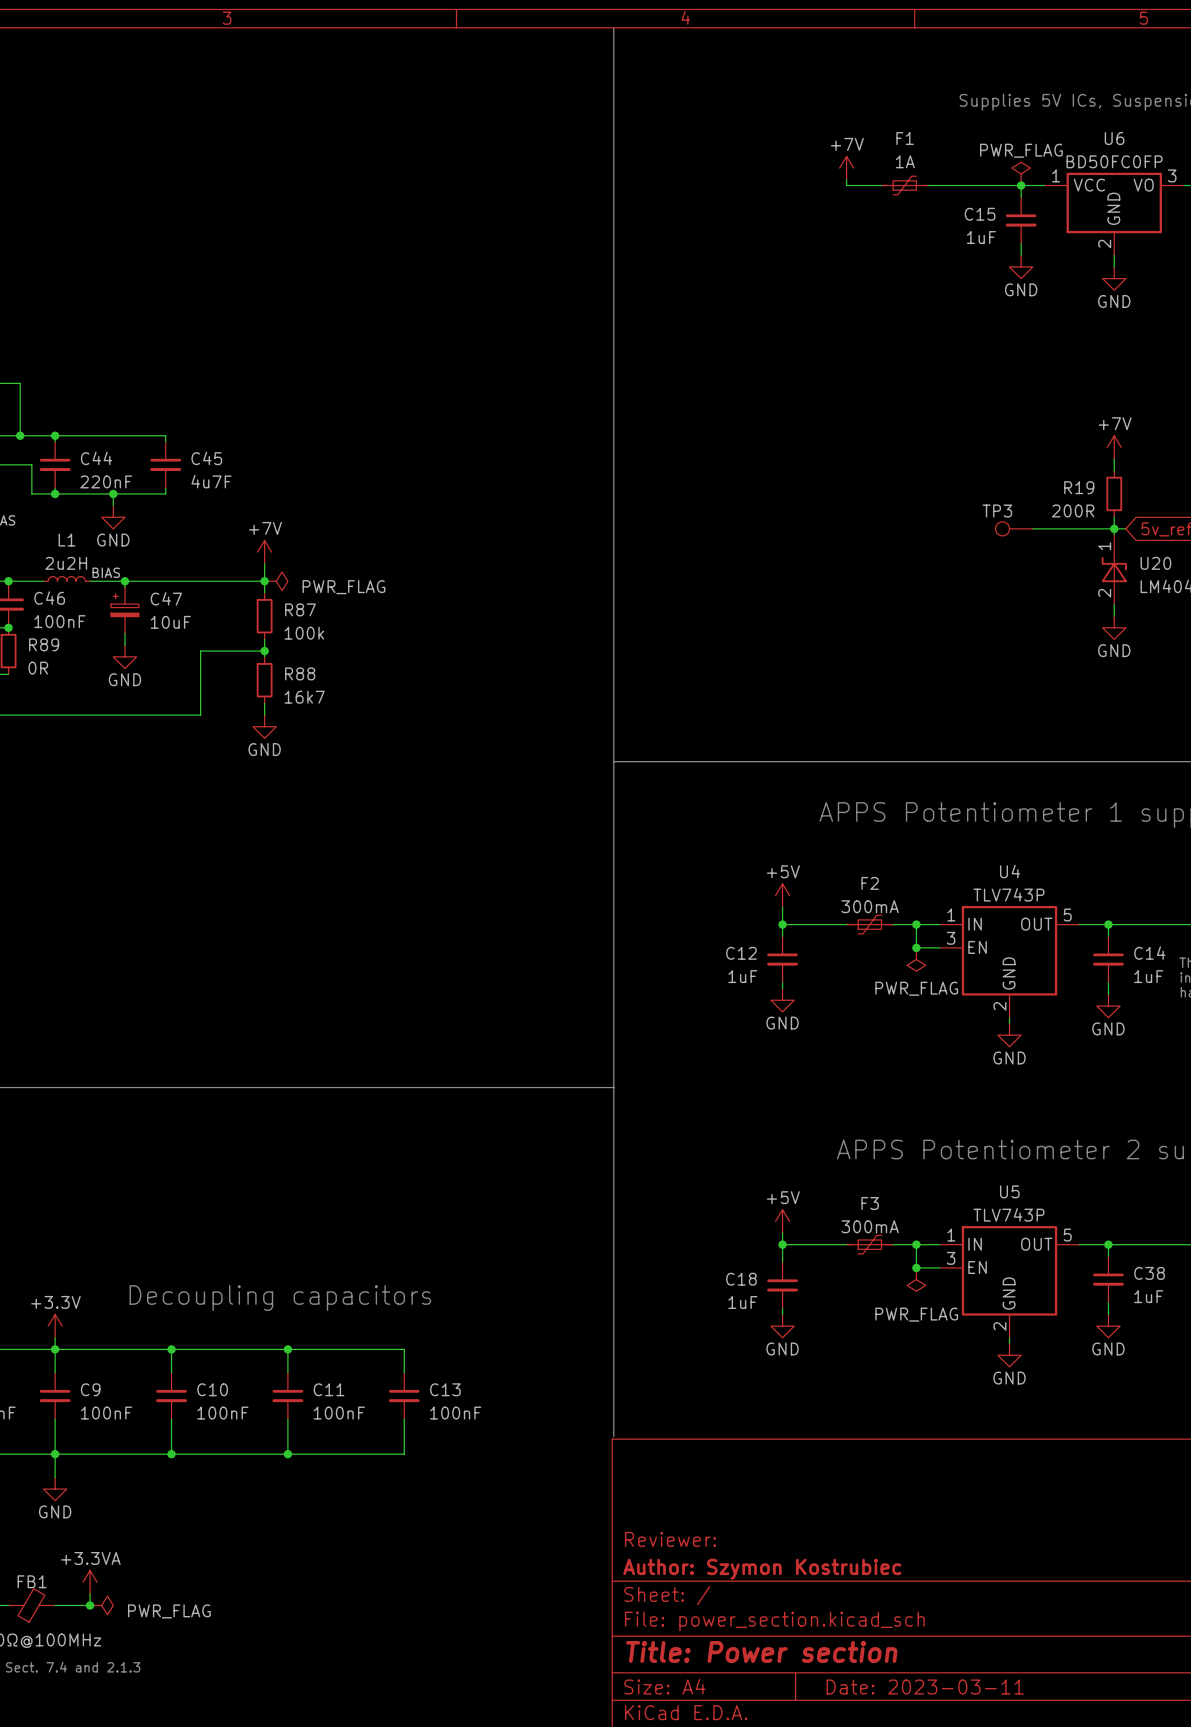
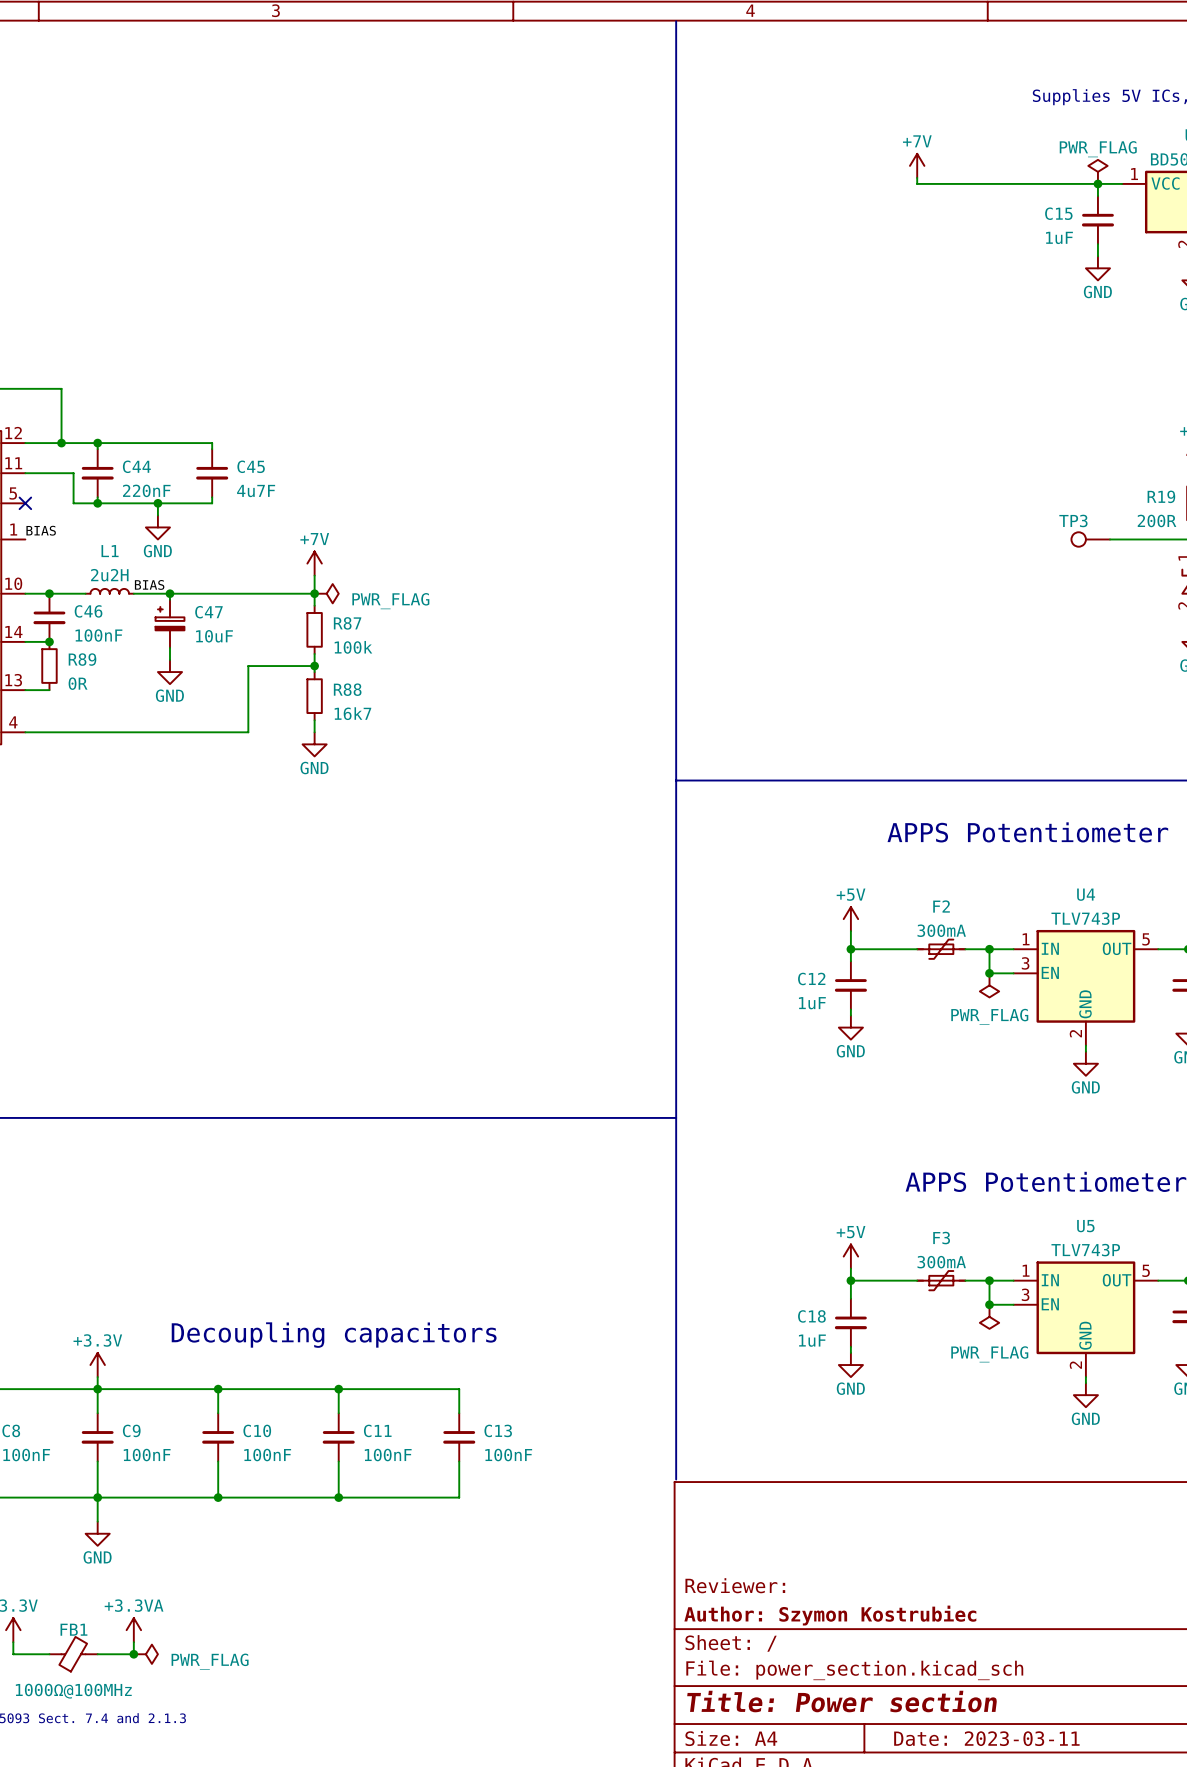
F1: 1A (904, 185) -> none

